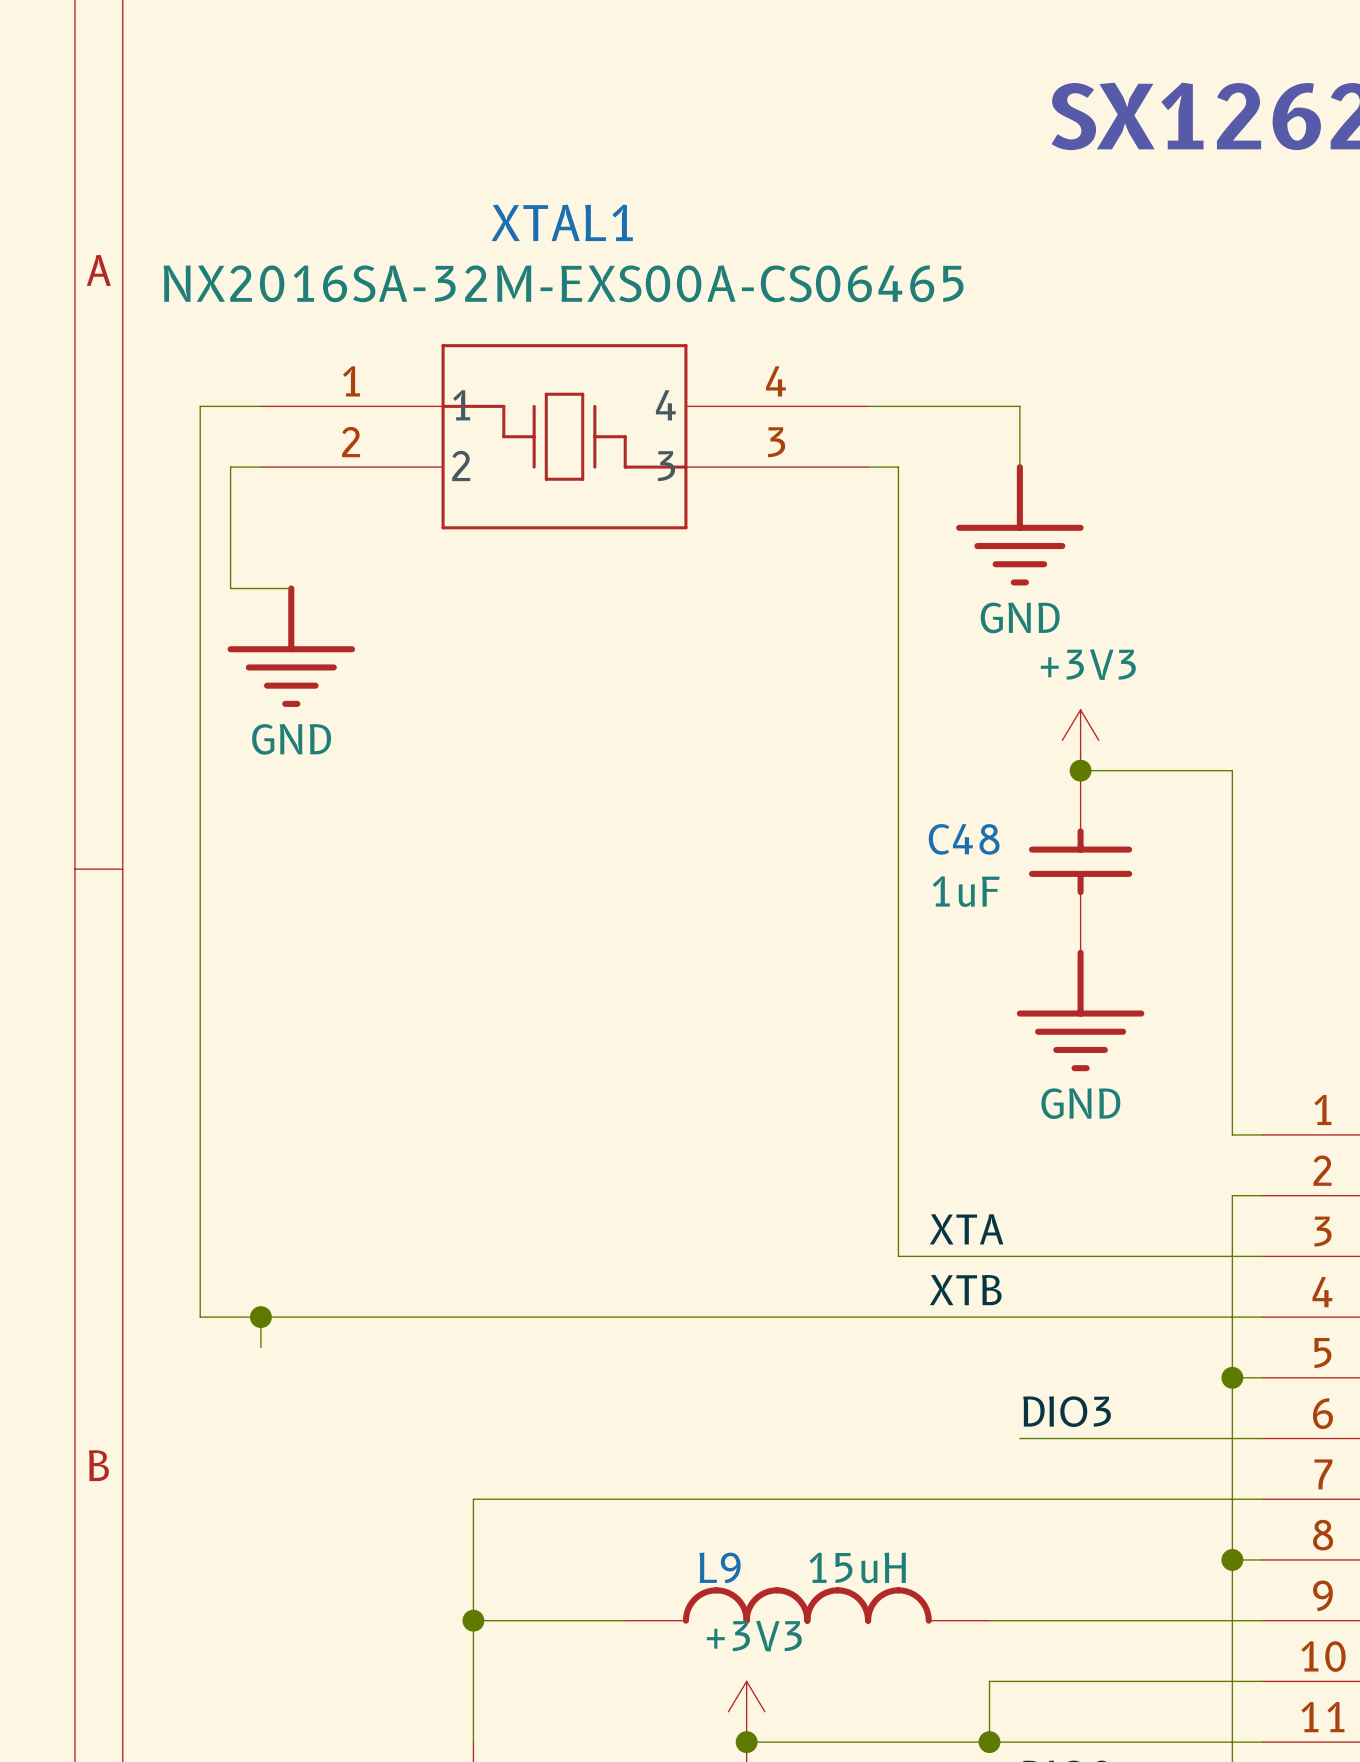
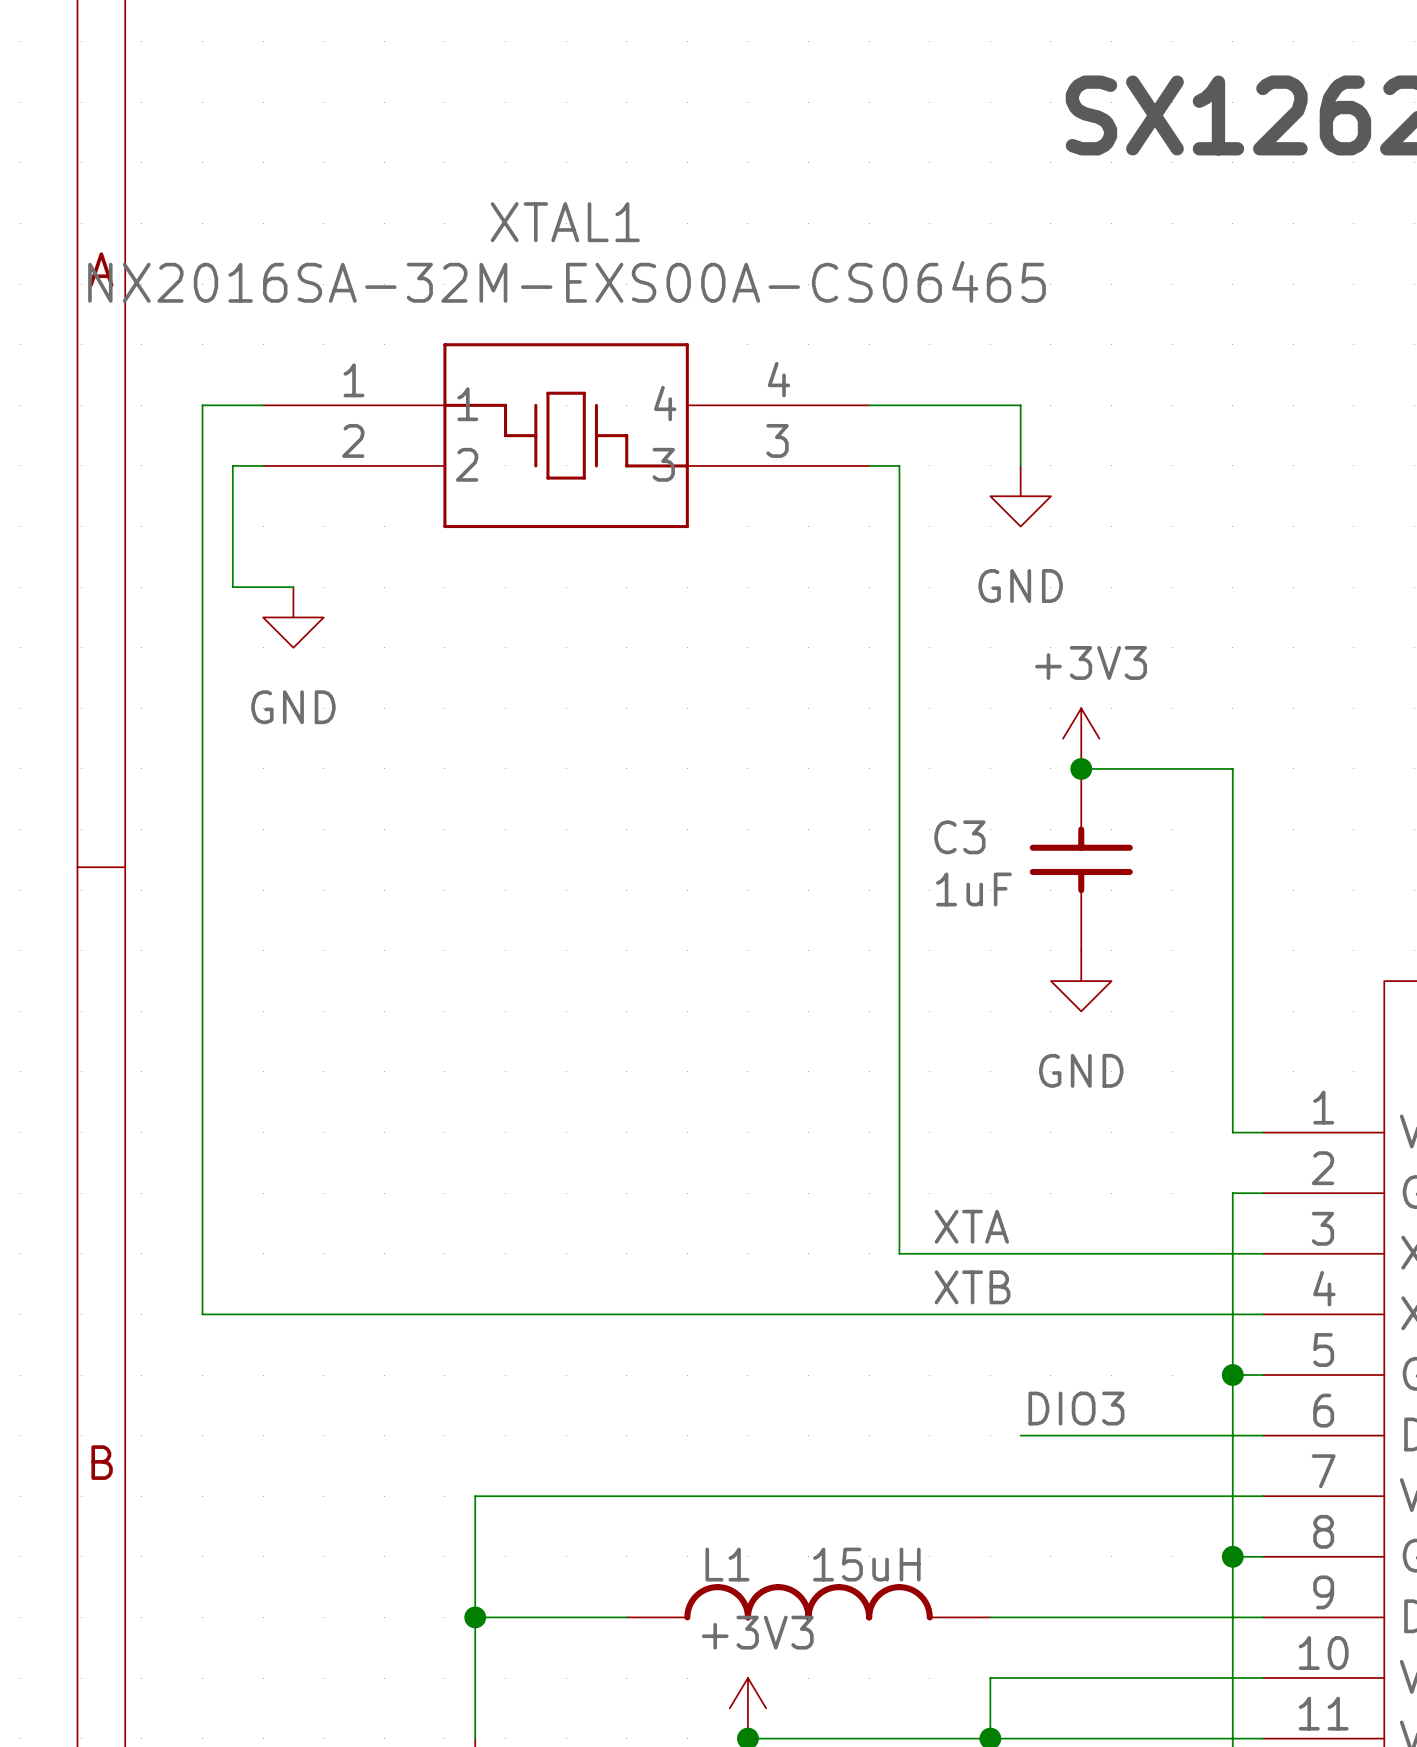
power symbol: none -> GND (1020, 496)
power symbol: GND (1019, 524) -> none
power symbol: none -> GND (293, 617)
power symbol: GND (291, 646) -> none
C48 name: C48 (964, 839) -> C3 (959, 837)
power symbol: none -> GND (1081, 981)
power symbol: GND (1080, 1010) -> none
wire: (260, 1317) (260, 1347) -> none
junction: (260, 1317) -> none
L9 name: L9 (720, 1567) -> L1 (727, 1564)

